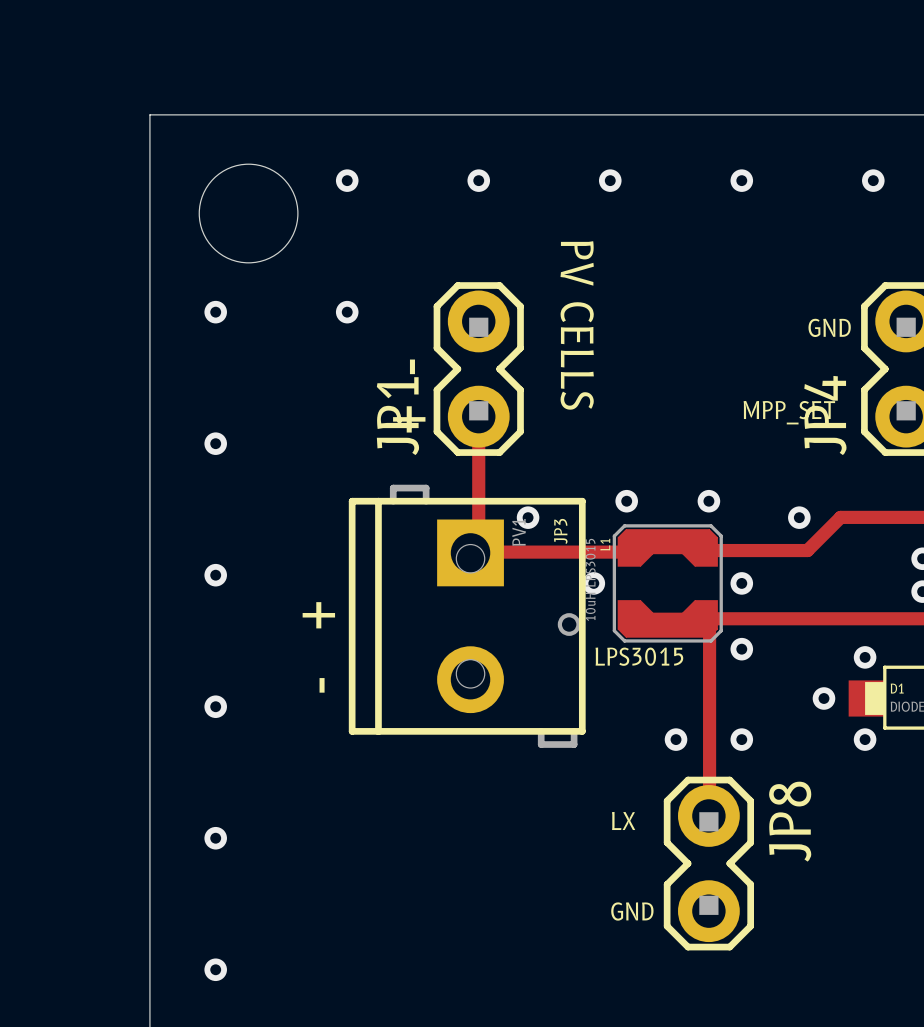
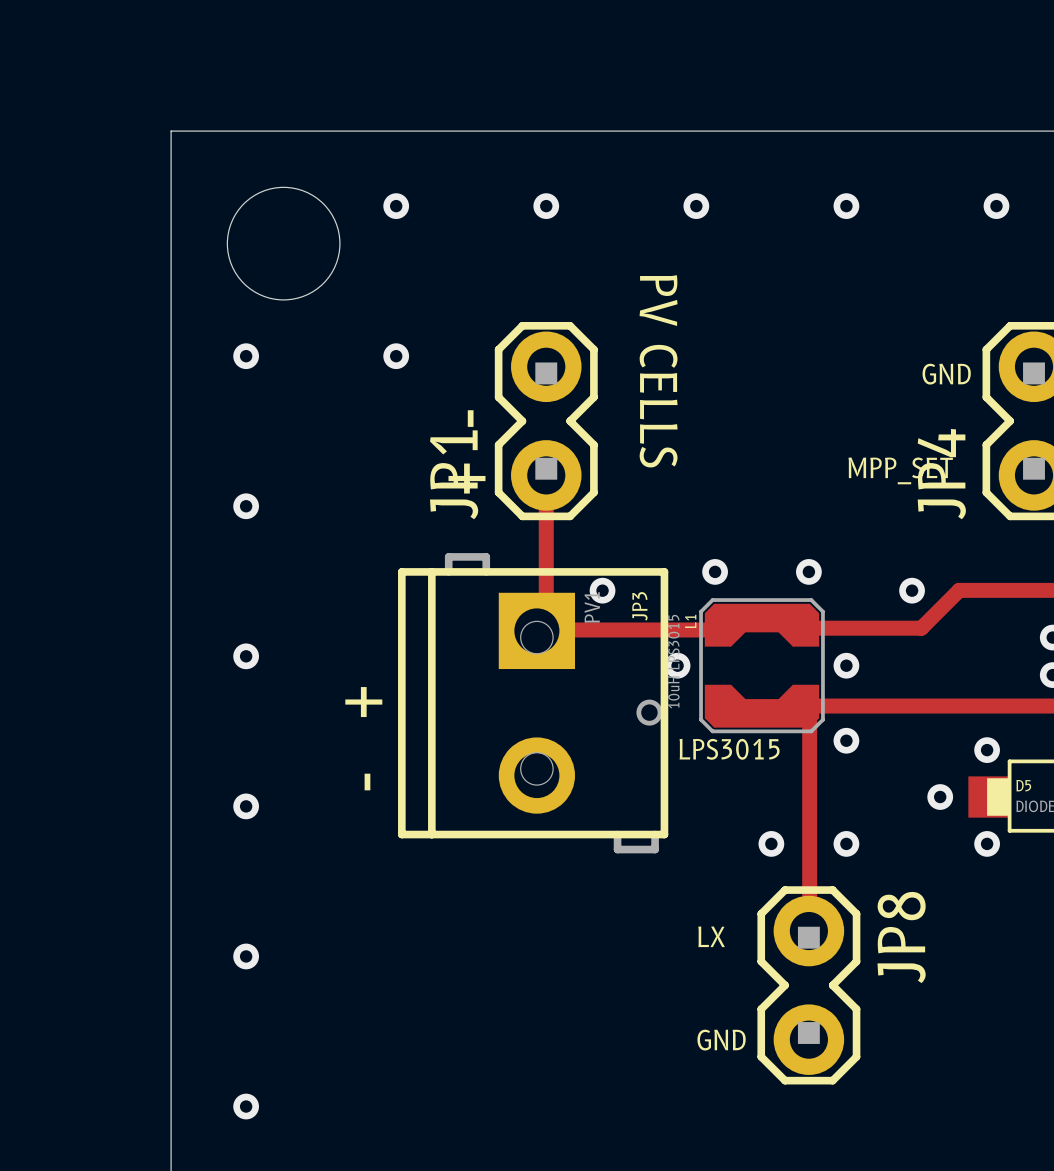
D1 name: D1 (897, 688) -> D5 (1023, 785)

